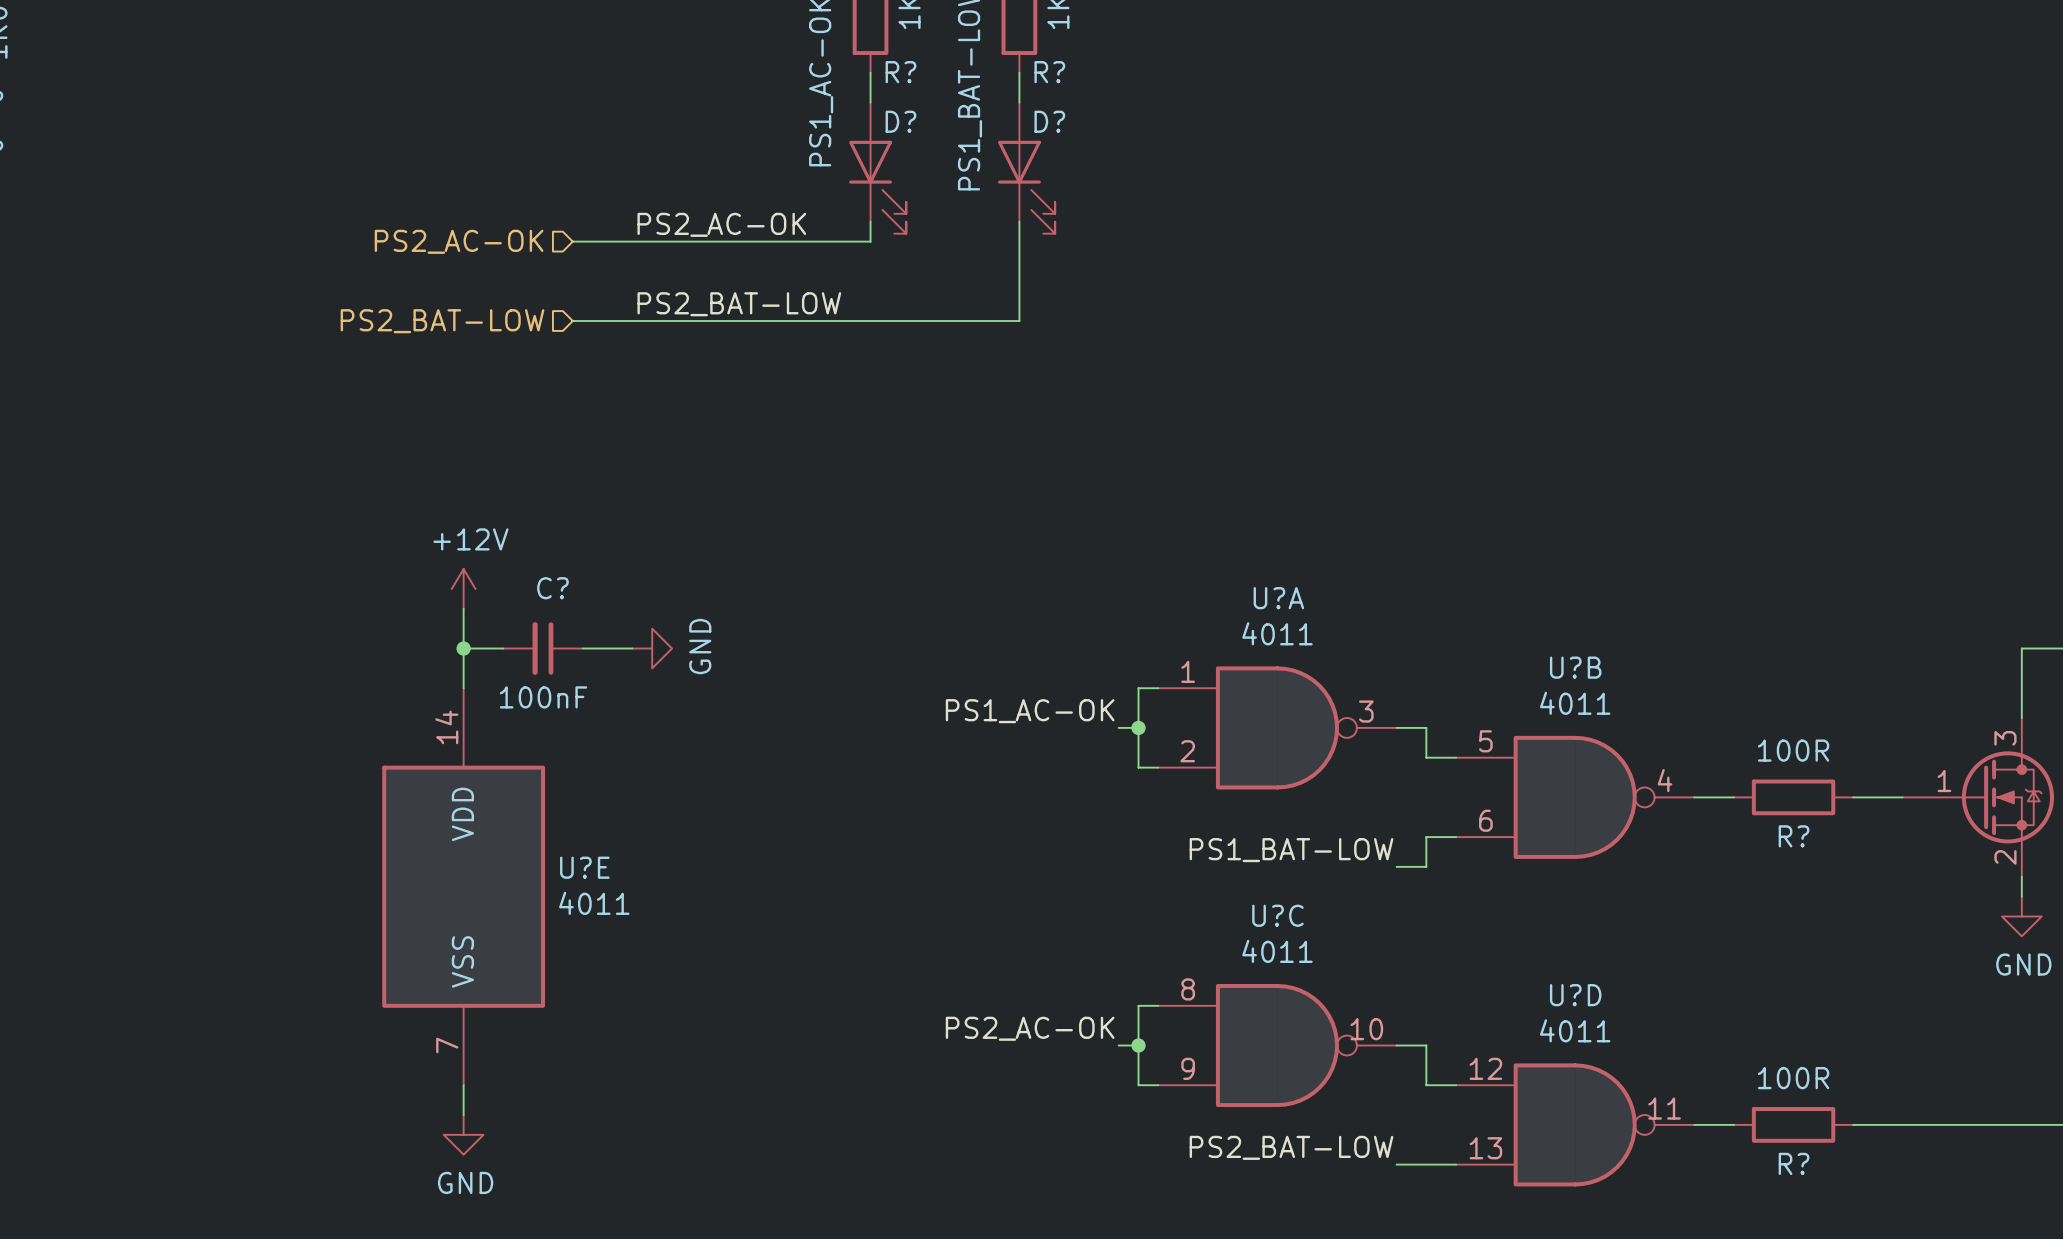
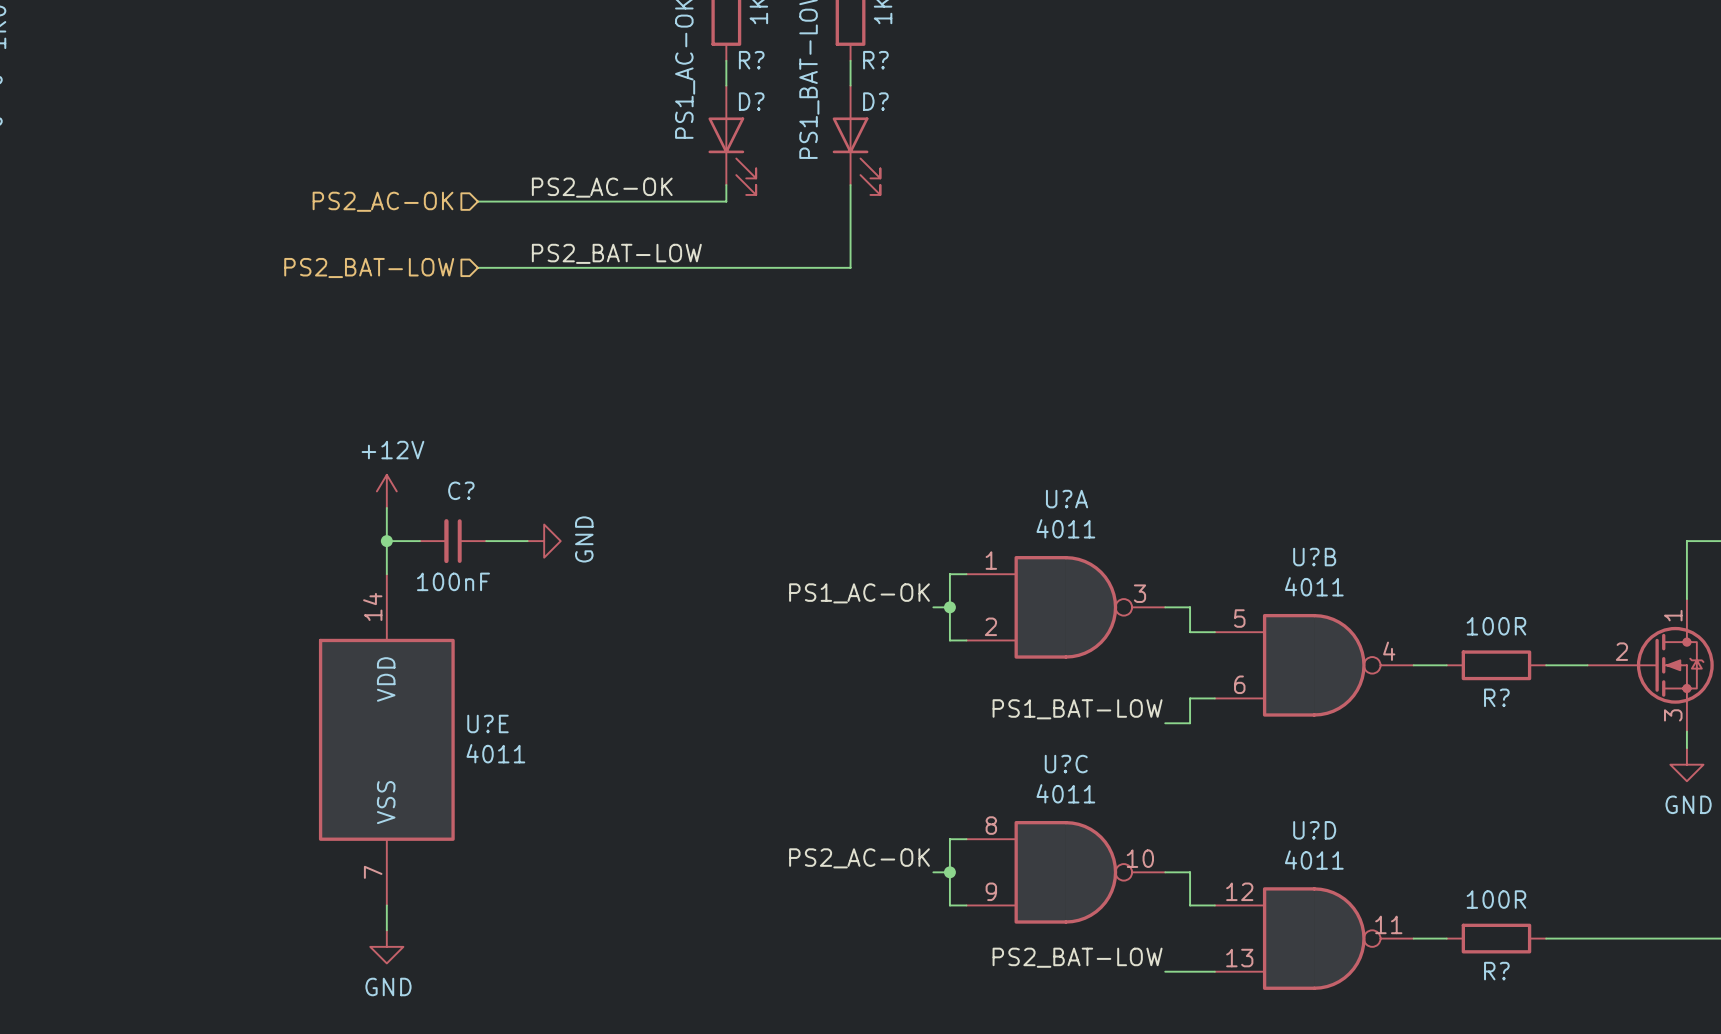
part pin number: 3 (2005, 738) -> 1 (1673, 615)
part pin number: 1 (1944, 781) -> 2 (1621, 651)
part pin number: 2 (2005, 857) -> 3 (1673, 715)

